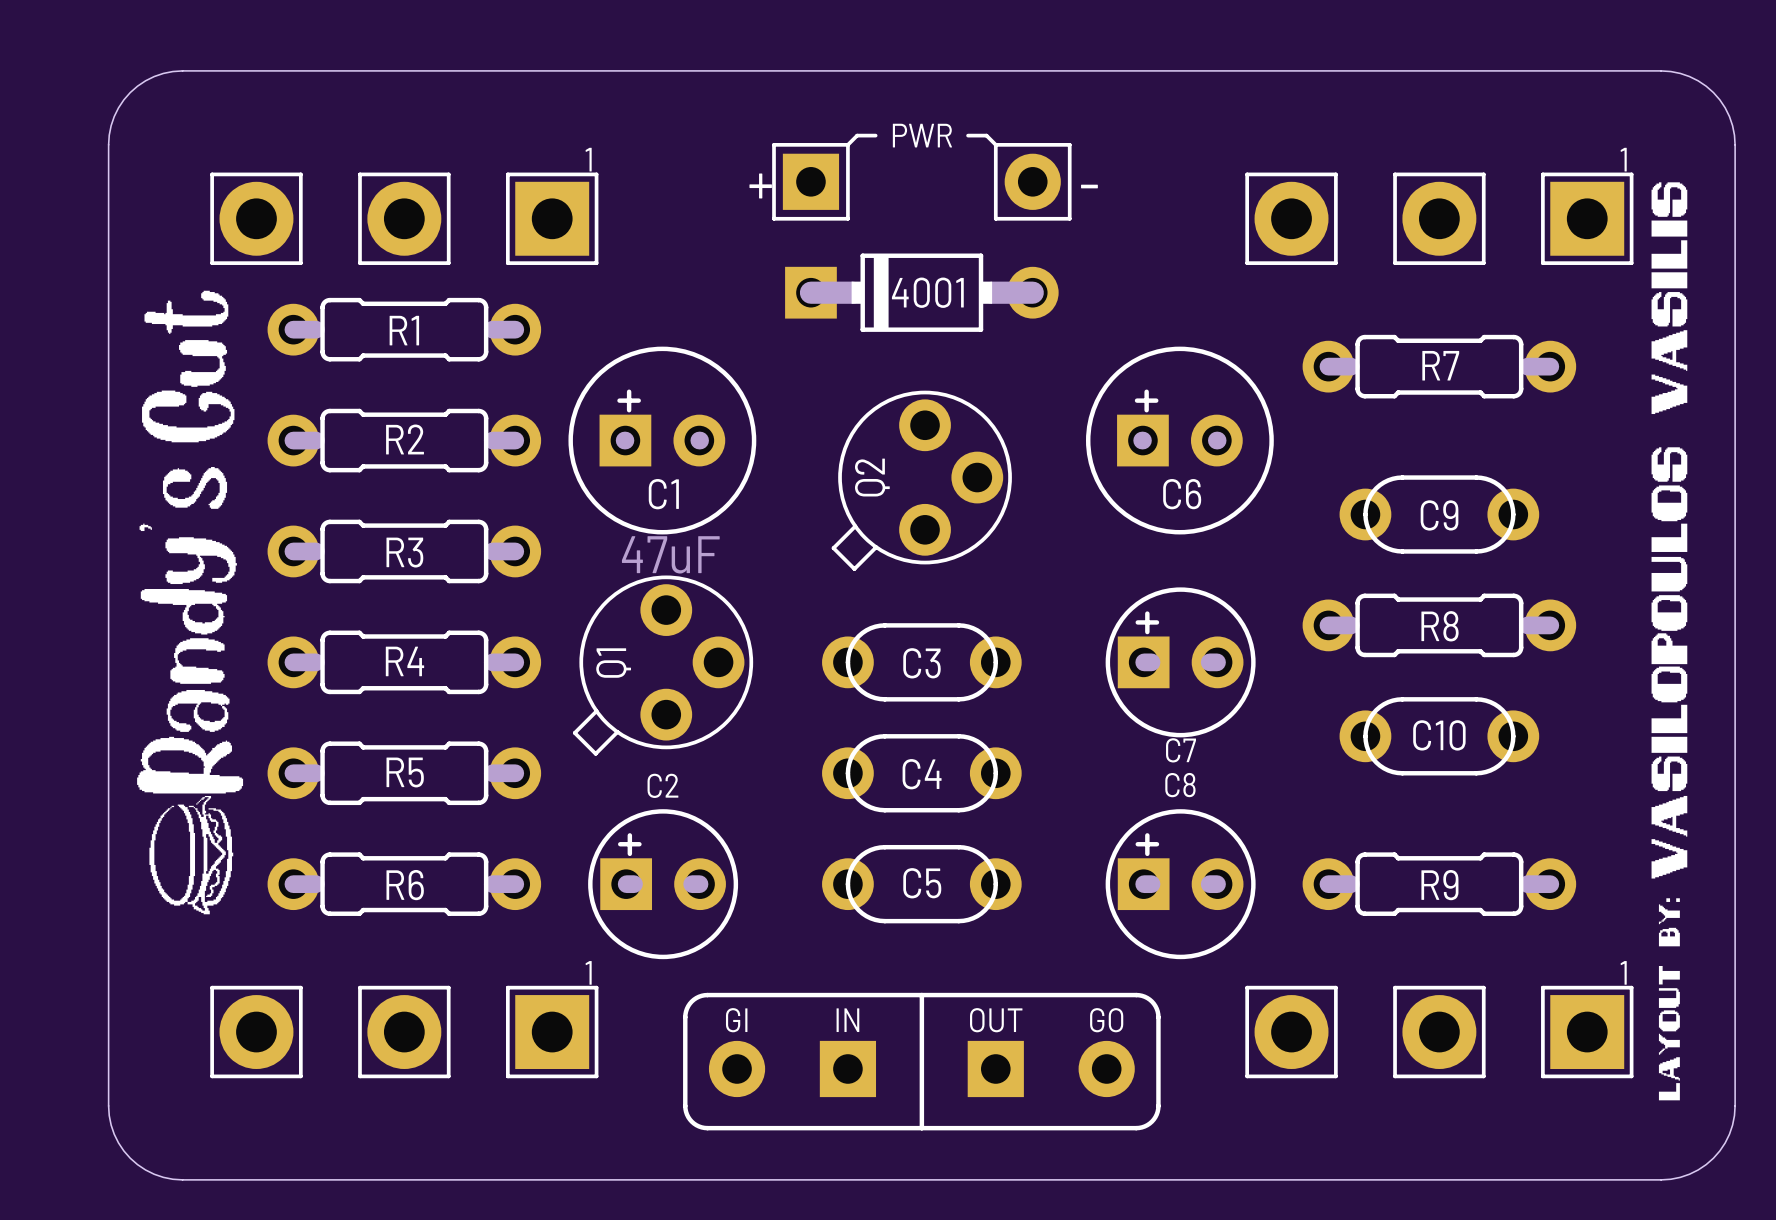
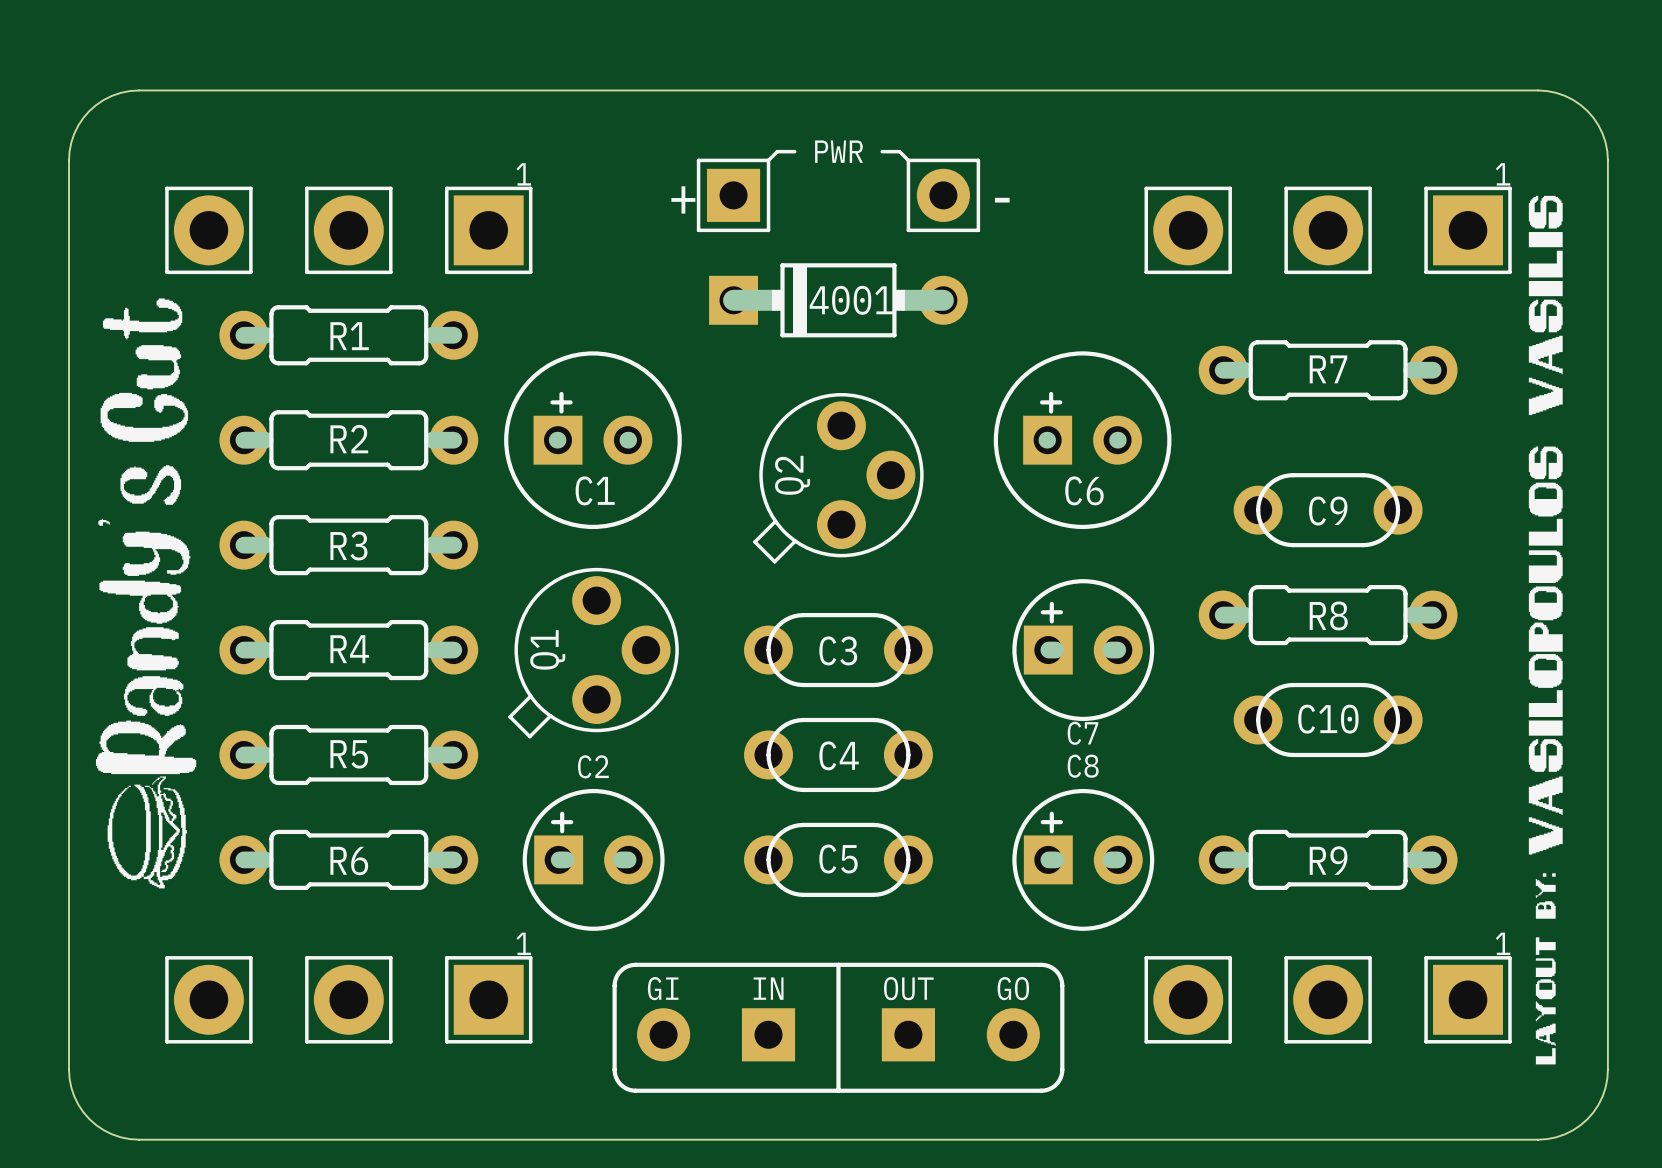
C1 value: 47uF (670, 554) -> none

